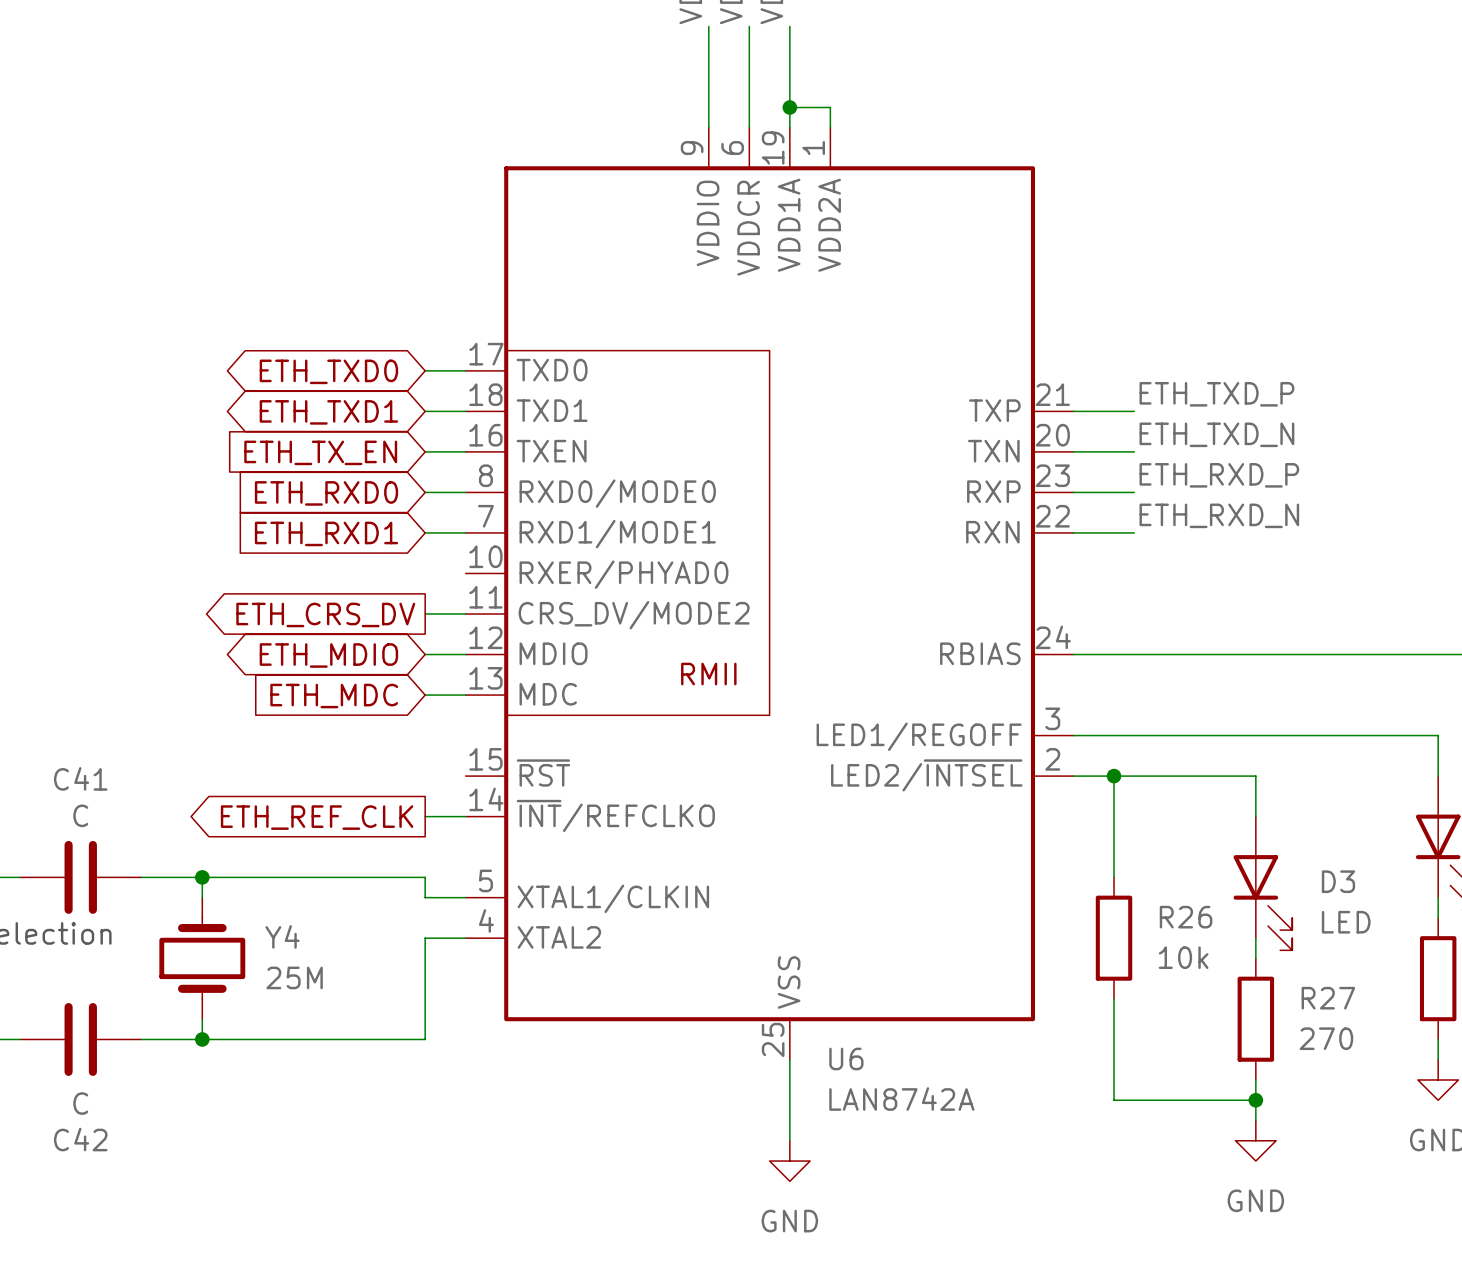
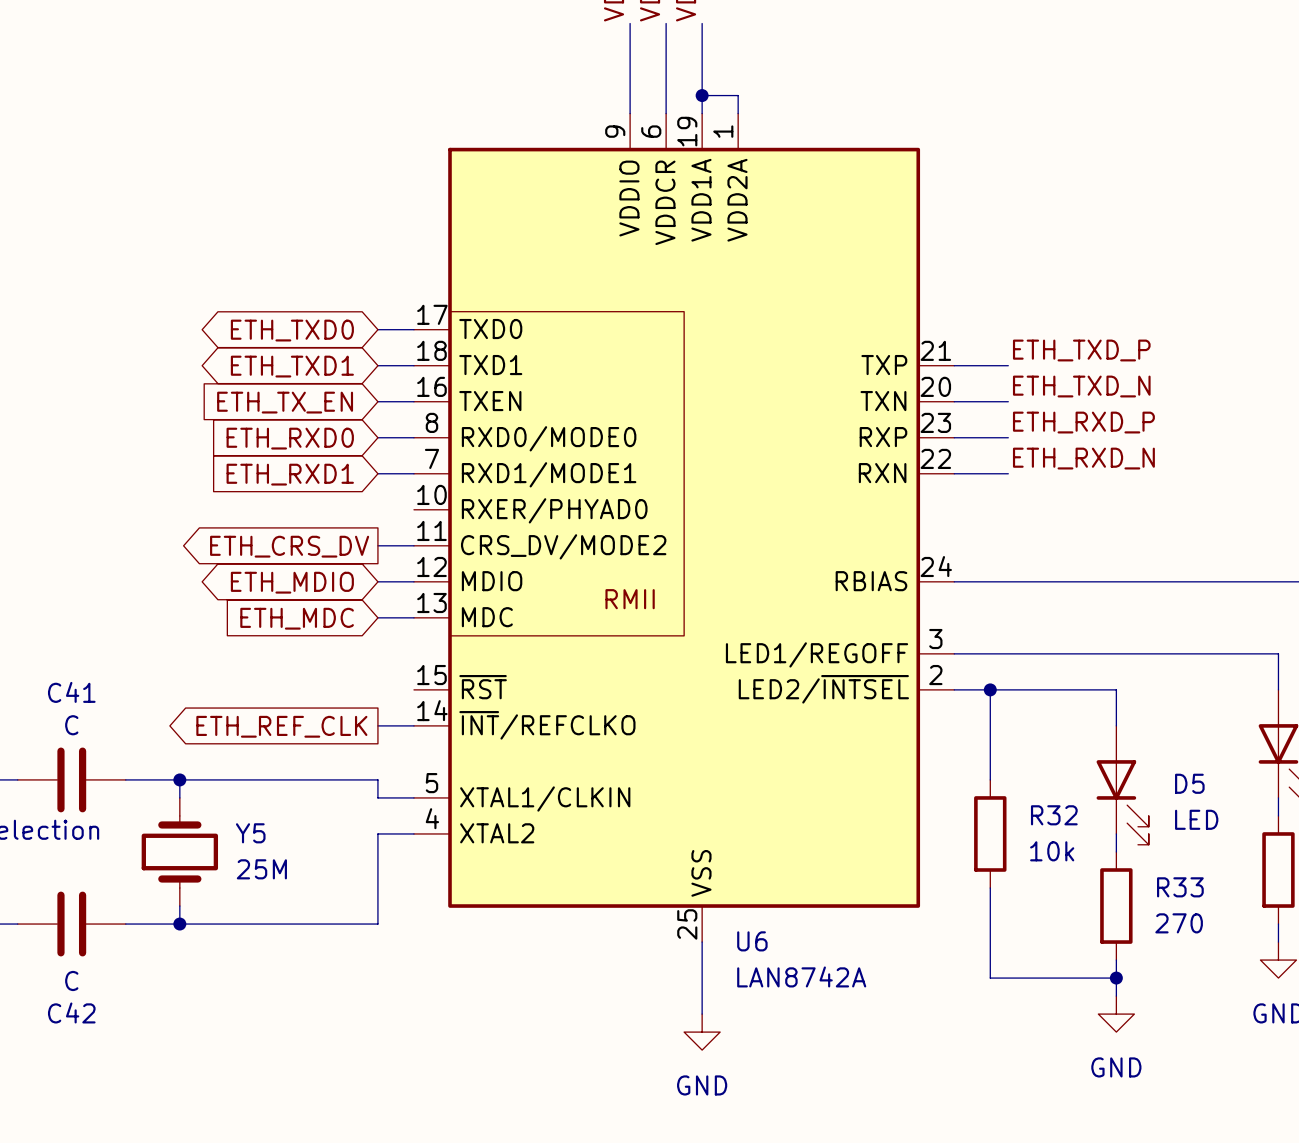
D3 name: D3 (1338, 881) -> D5 (1189, 783)
R26 name: R26 (1186, 917) -> R32 (1054, 815)
Y4 name: Y4 (282, 936) -> Y5 (250, 833)
R27 name: R27 (1328, 998) -> R33 (1180, 887)

